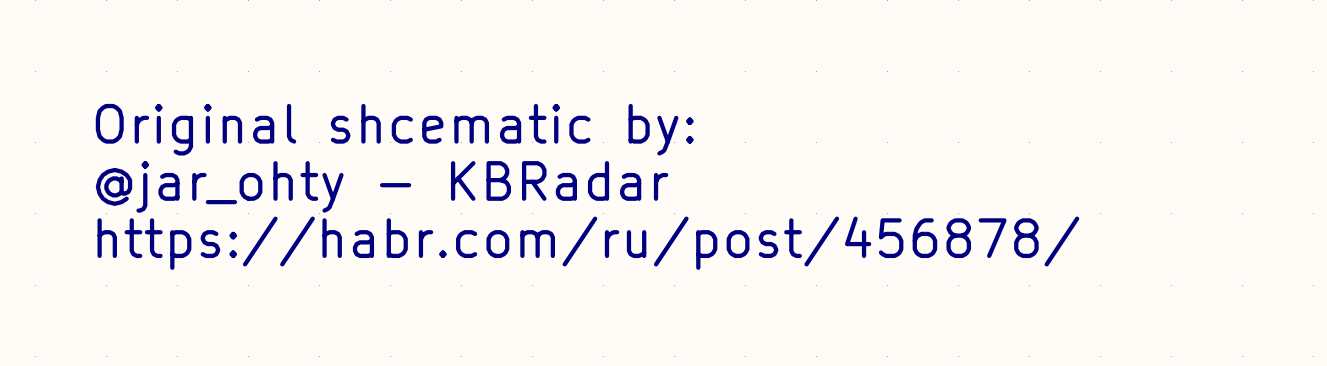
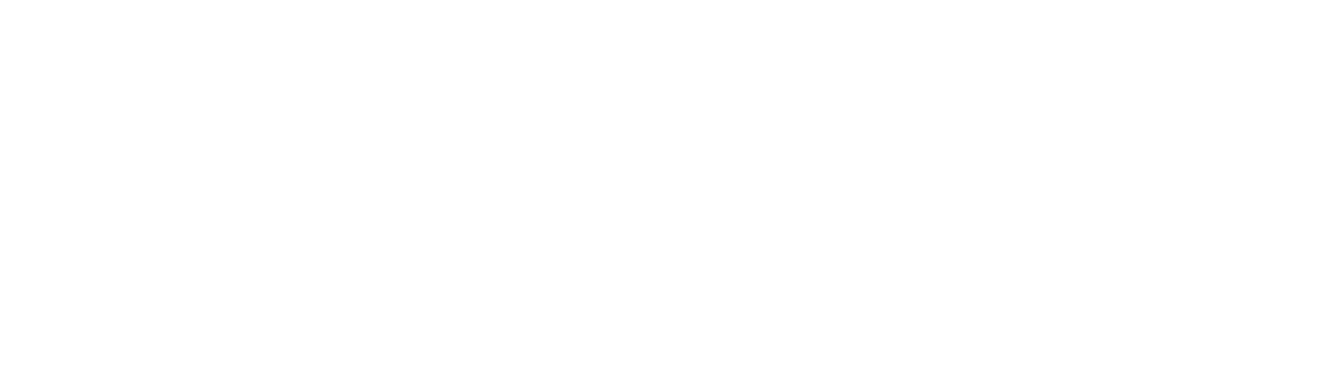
text: Original shcematic by: (394, 129) -> none
text: @jar_ohty - KBRadar (382, 186) -> none
text: https://habr.com/ru/post/456878/ (588, 243) -> none

